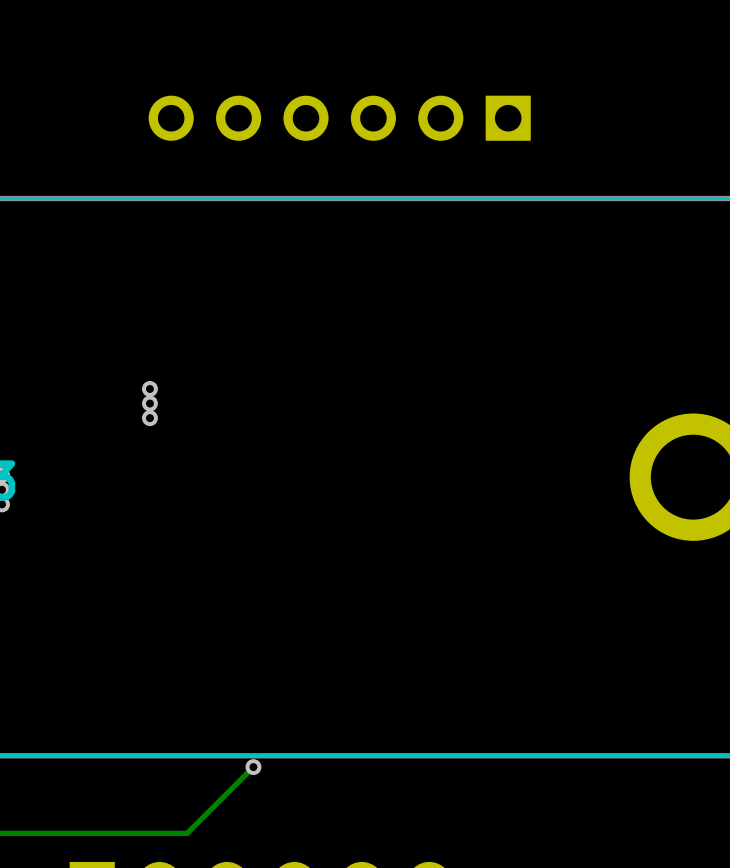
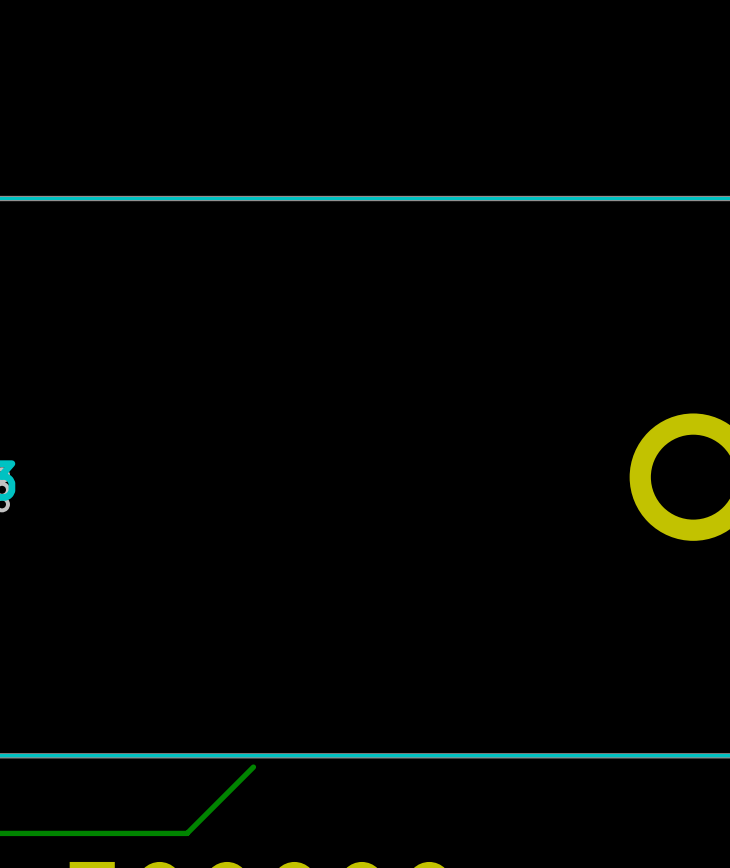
part: (339, 118) -> none
via: (149, 388) -> none
via: (149, 403) -> none
via: (149, 418) -> none
via: (253, 767) -> none

